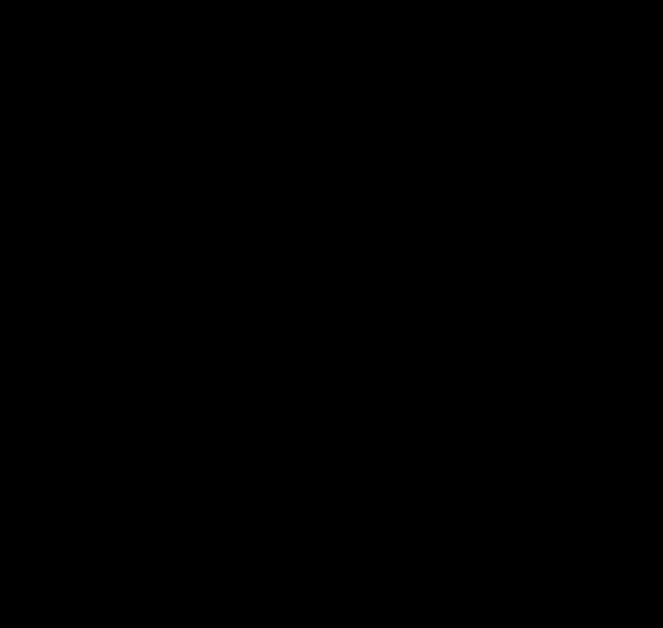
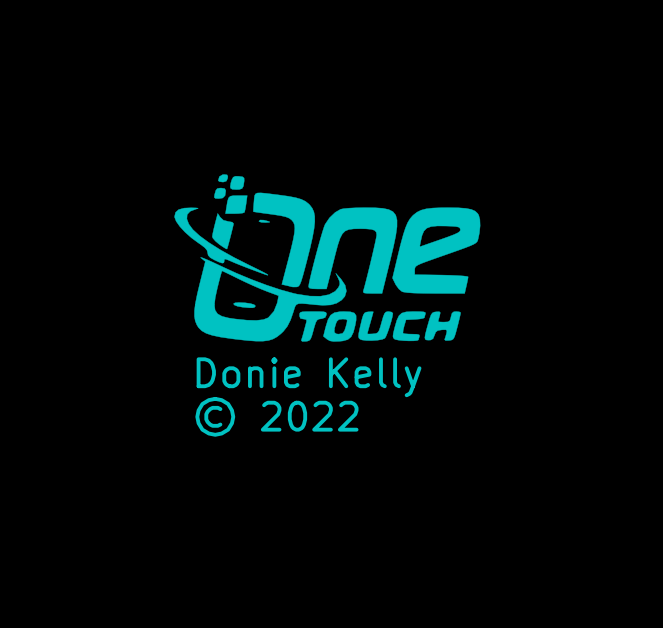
drawing: none -> [174, 174, 481, 342]
text: none -> Donie Kelly (309, 377)
text: none -> © 2022 (276, 416)

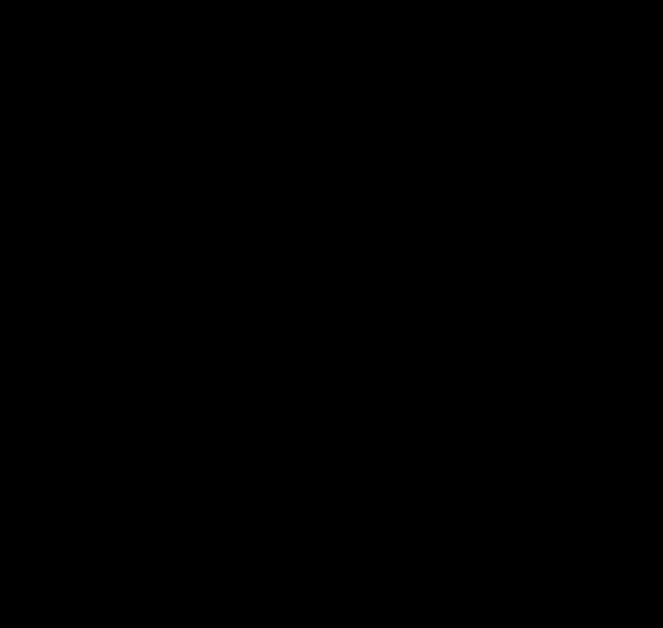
drawing: [174, 174, 481, 342] -> none
text: Donie Kelly (309, 377) -> none
text: © 2022 (276, 416) -> none

